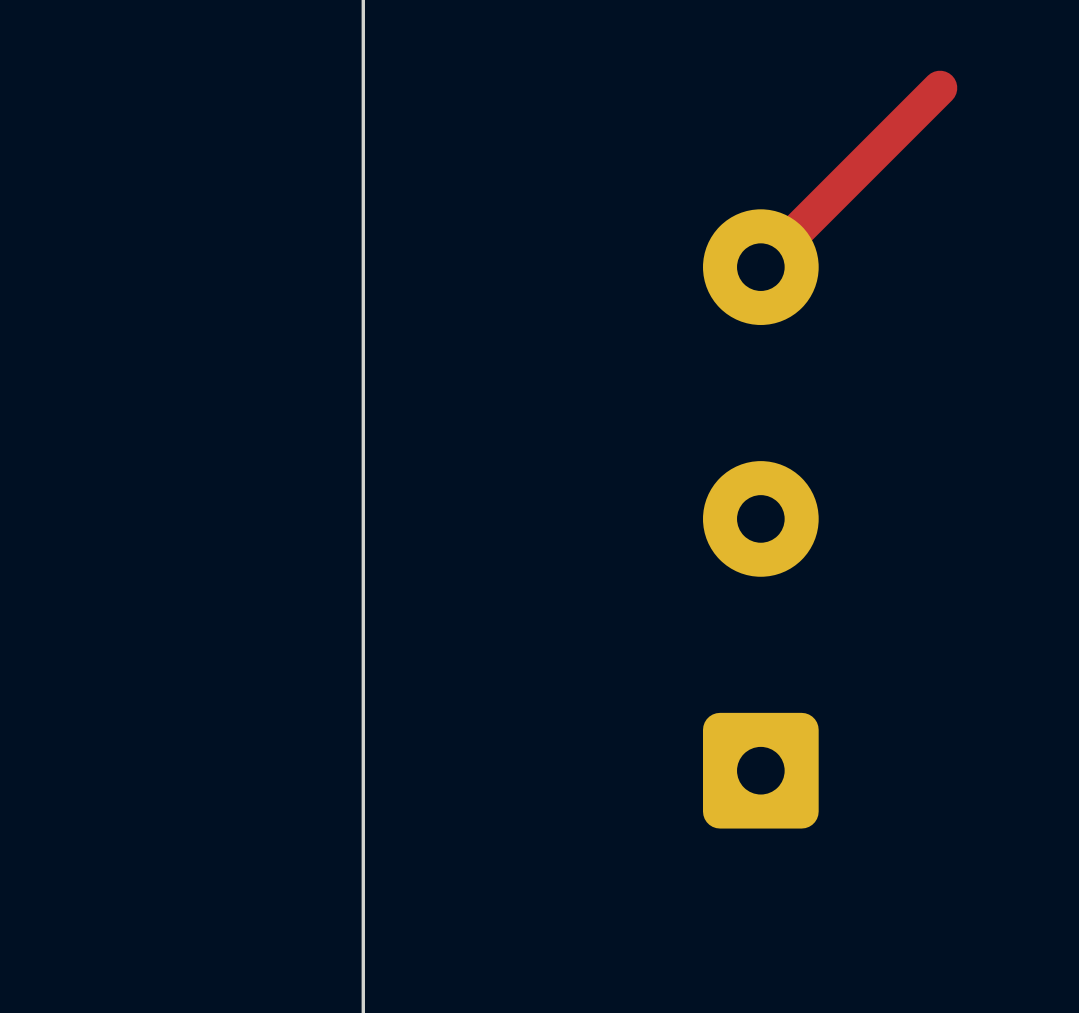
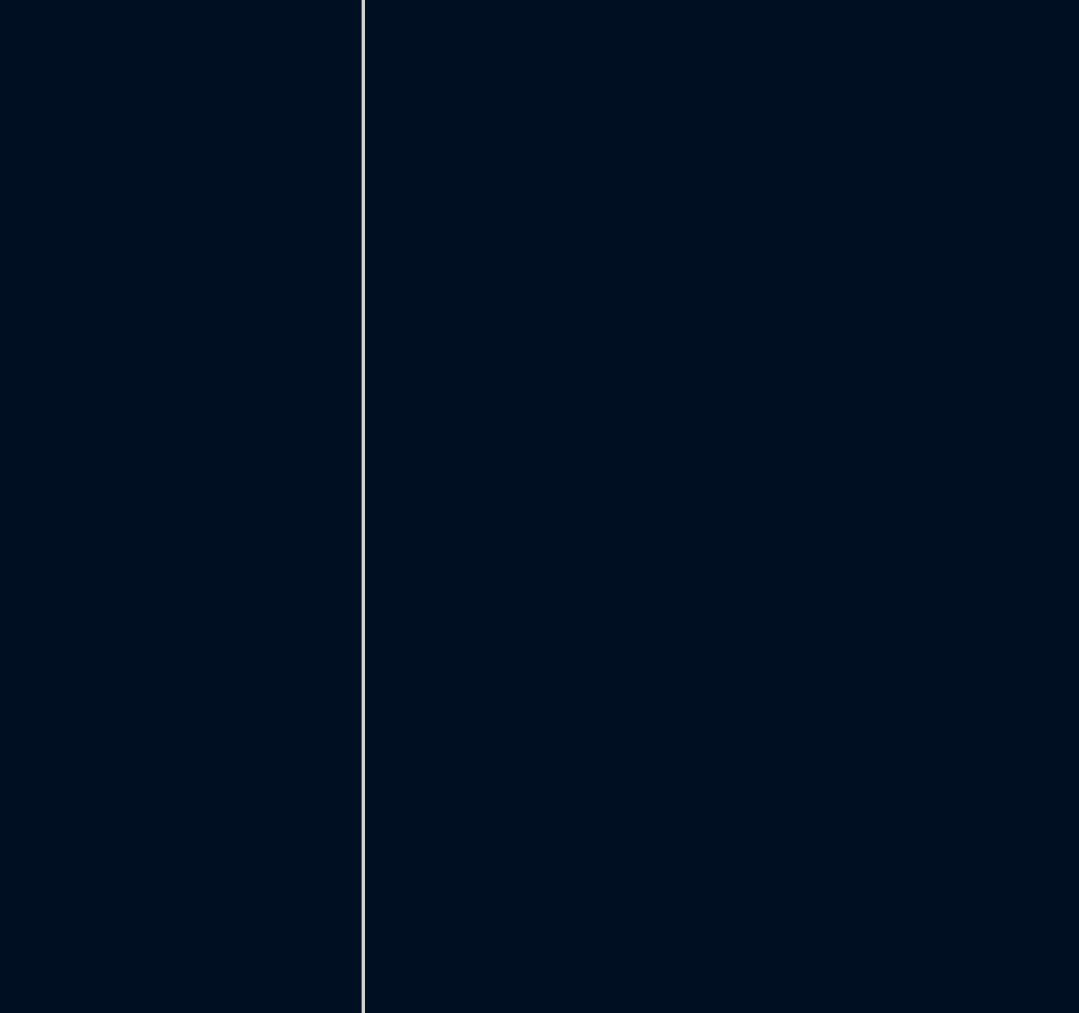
top track: (940, 87) (760, 267) -> none
part: (760, 518) -> none

